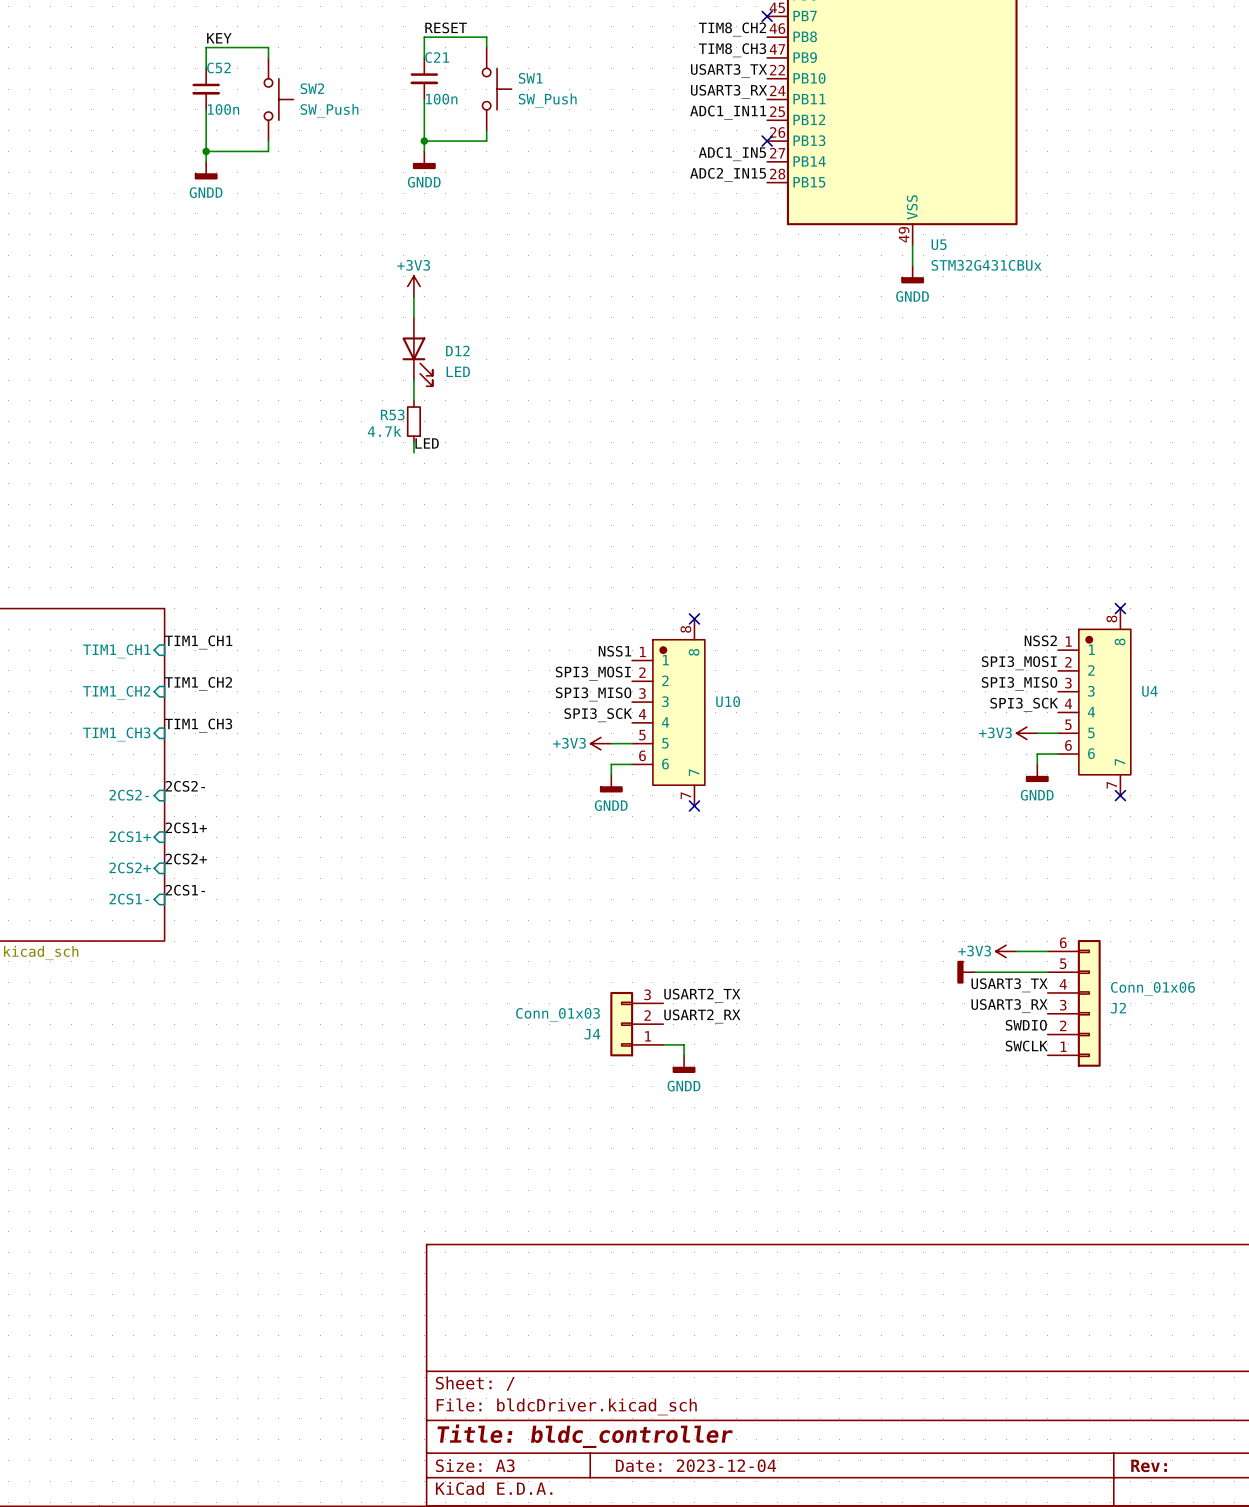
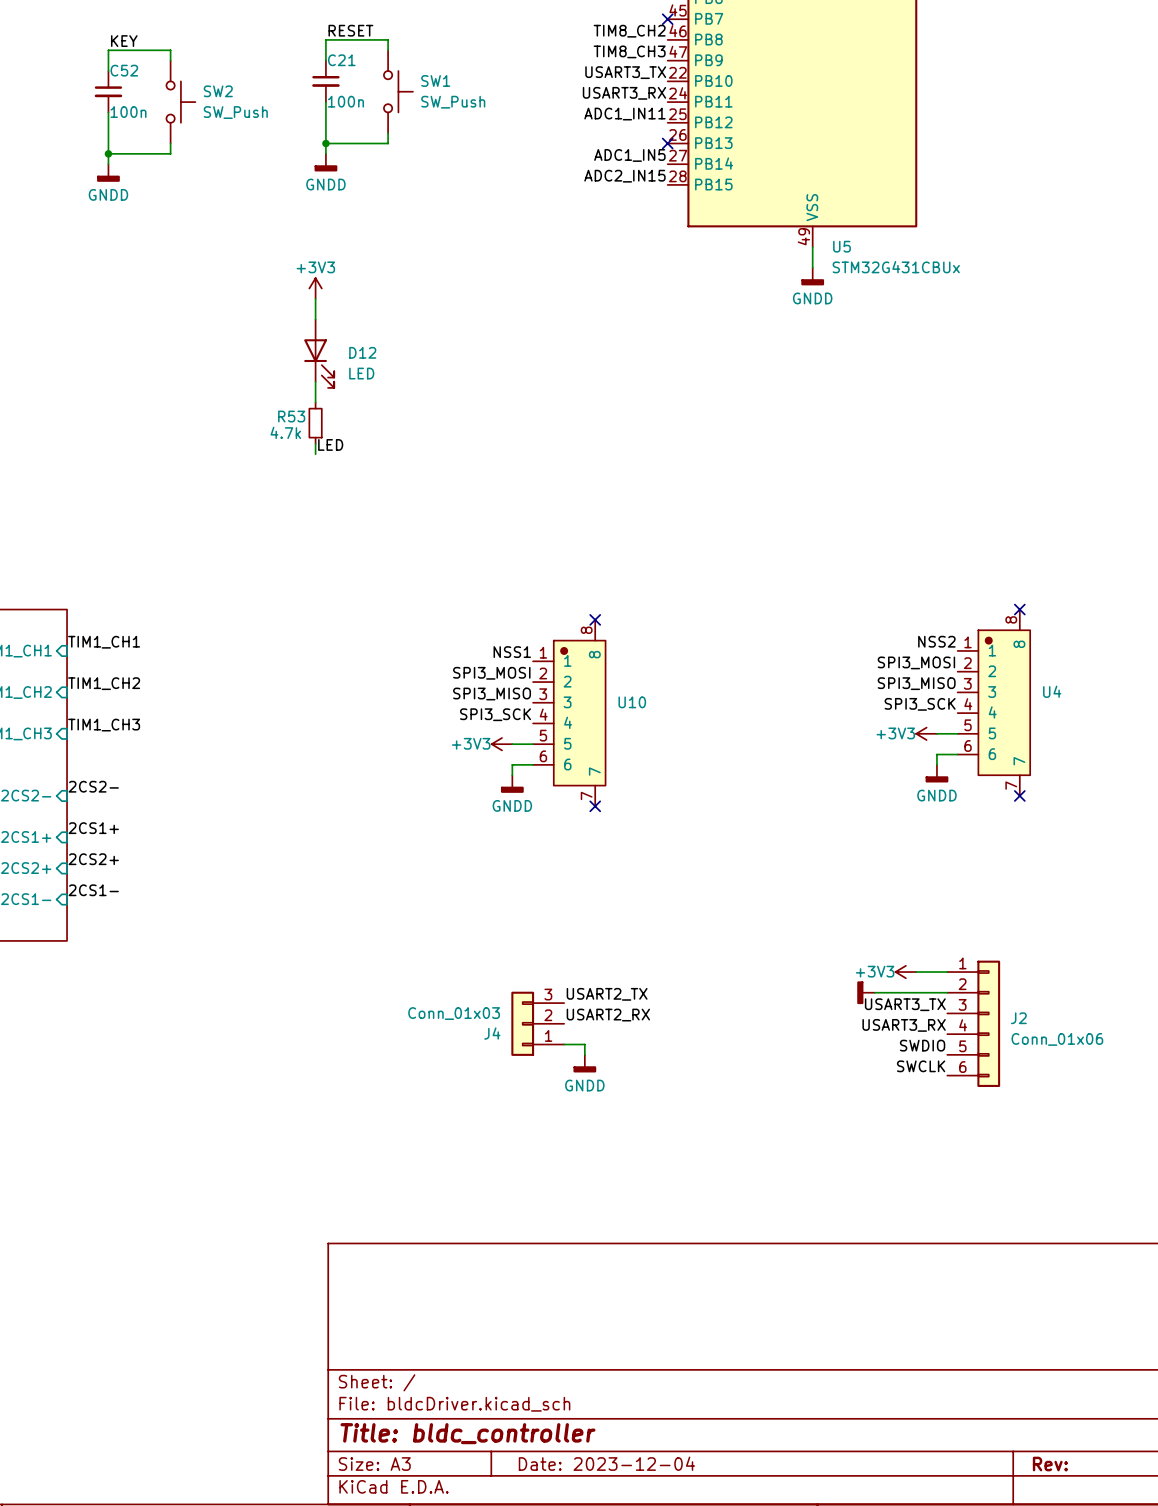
power symbol position: +3V3 (1006, 951) -> +3V3 (905, 972)
wire: (1016, 951) (1047, 951) -> none
power symbol position: (966, 972) -> (866, 992)
label: USART3_TX (1009, 985) -> none
wire: none -> (874, 992) (947, 992)
J2 flip: as is (1089, 1003) -> up-down (988, 1023)
label: USART3_RX (1009, 1006) -> USART3_TX (905, 1004)
label: SWDIO (1026, 1025) -> USART3_RX (904, 1025)
label: SWCLK (1026, 1046) -> SWDIO (922, 1045)
label: none -> SWCLK (921, 1066)

